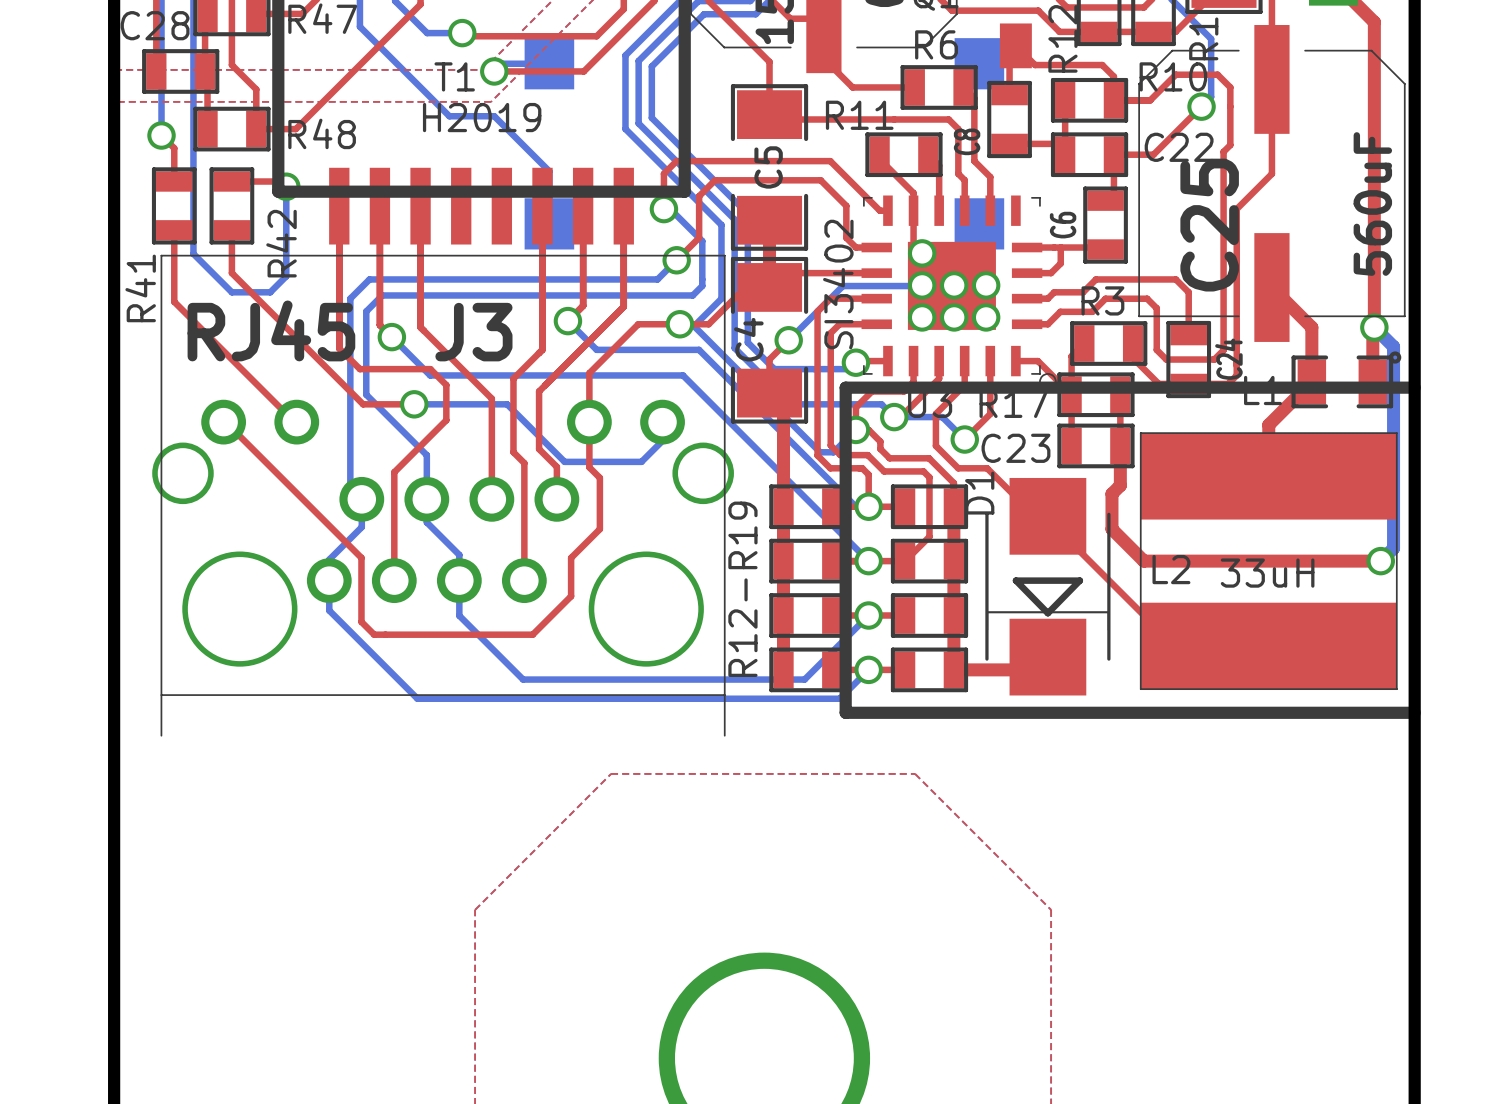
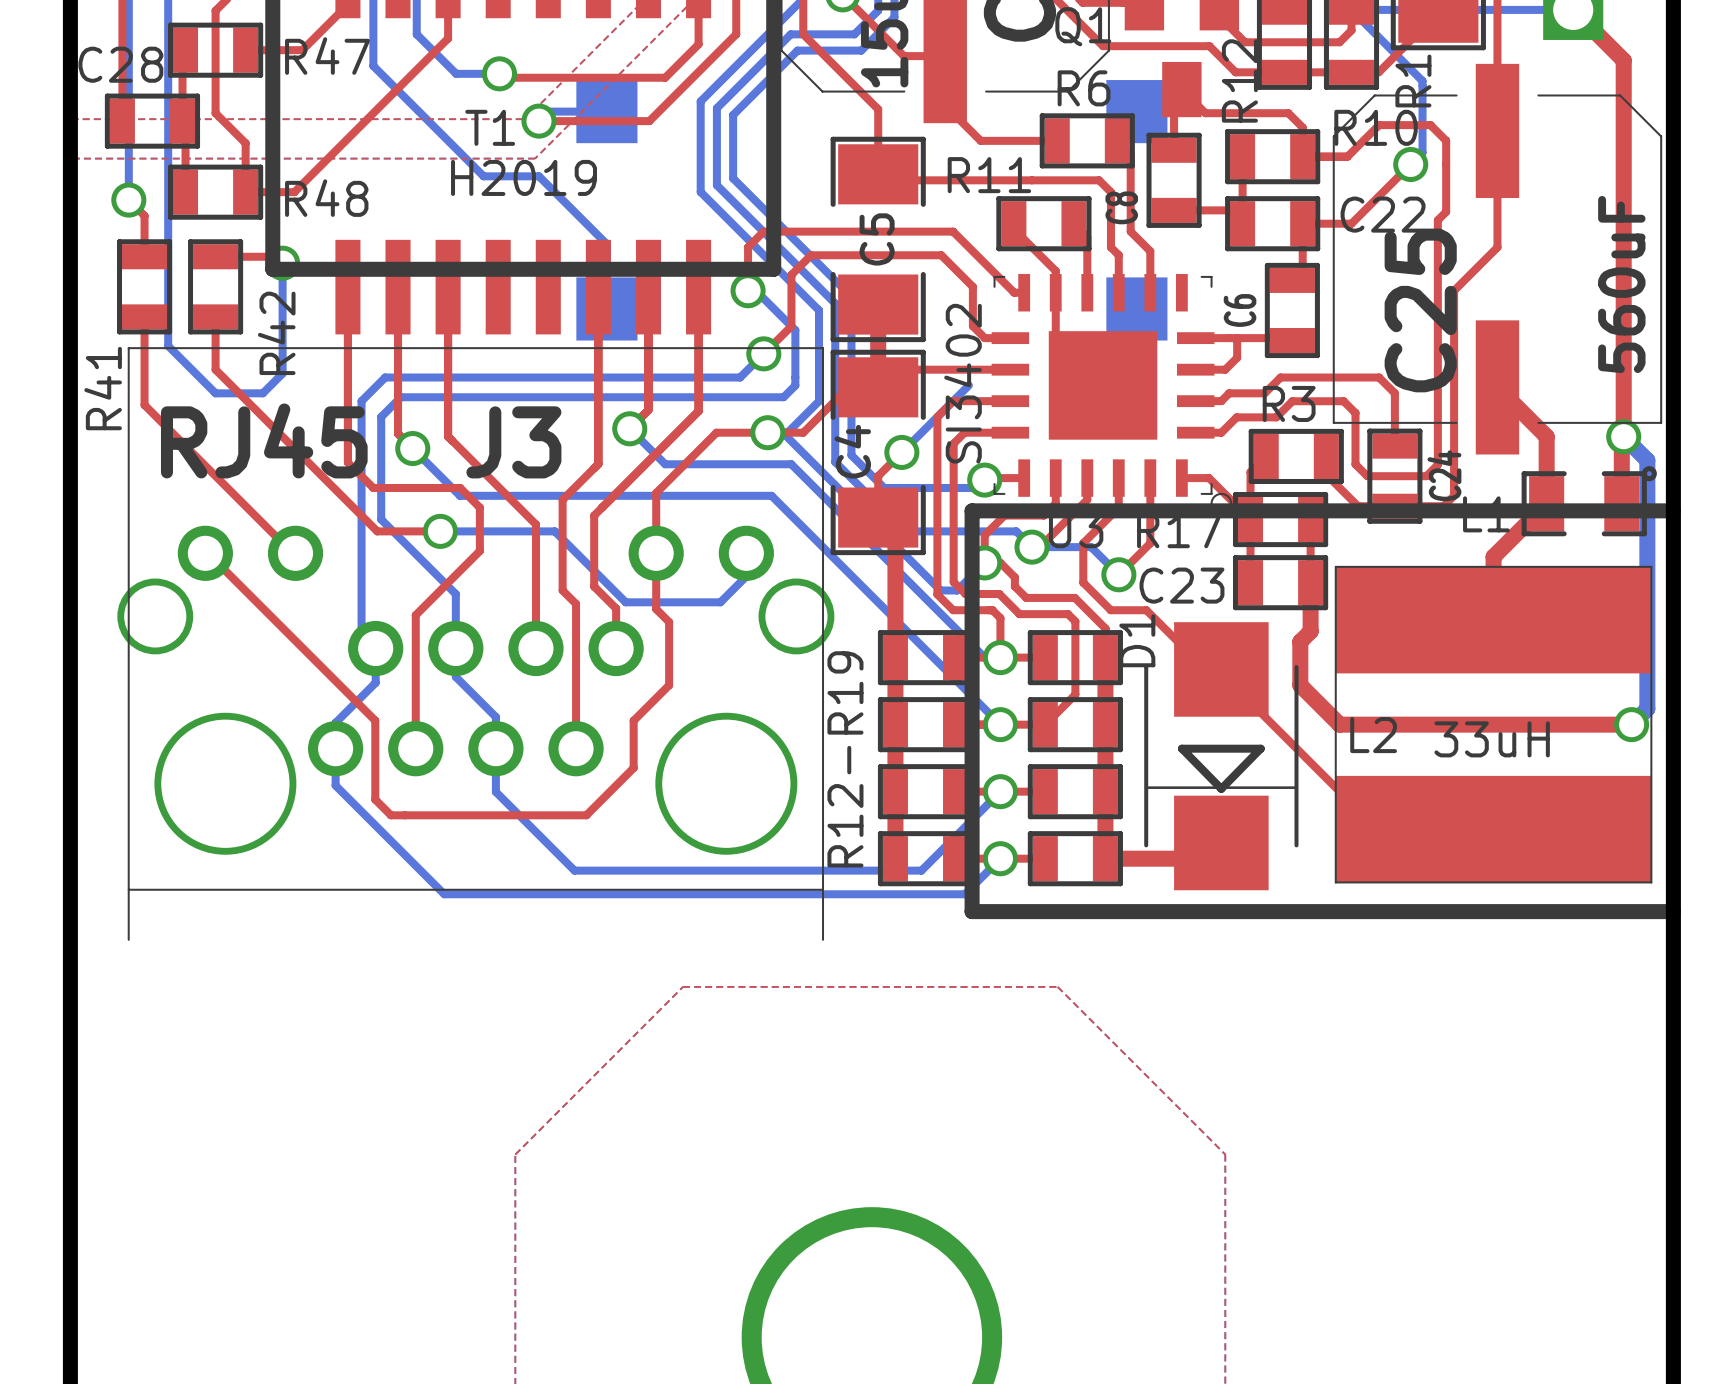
bottom track: (922, 253) (921, 286) (842, 286) -> none
via: (922, 253) -> none
via: (922, 285) -> none
via: (954, 285) -> none
via: (986, 285) -> none
via: (922, 317) -> none
via: (954, 317) -> none
via: (986, 317) -> none

